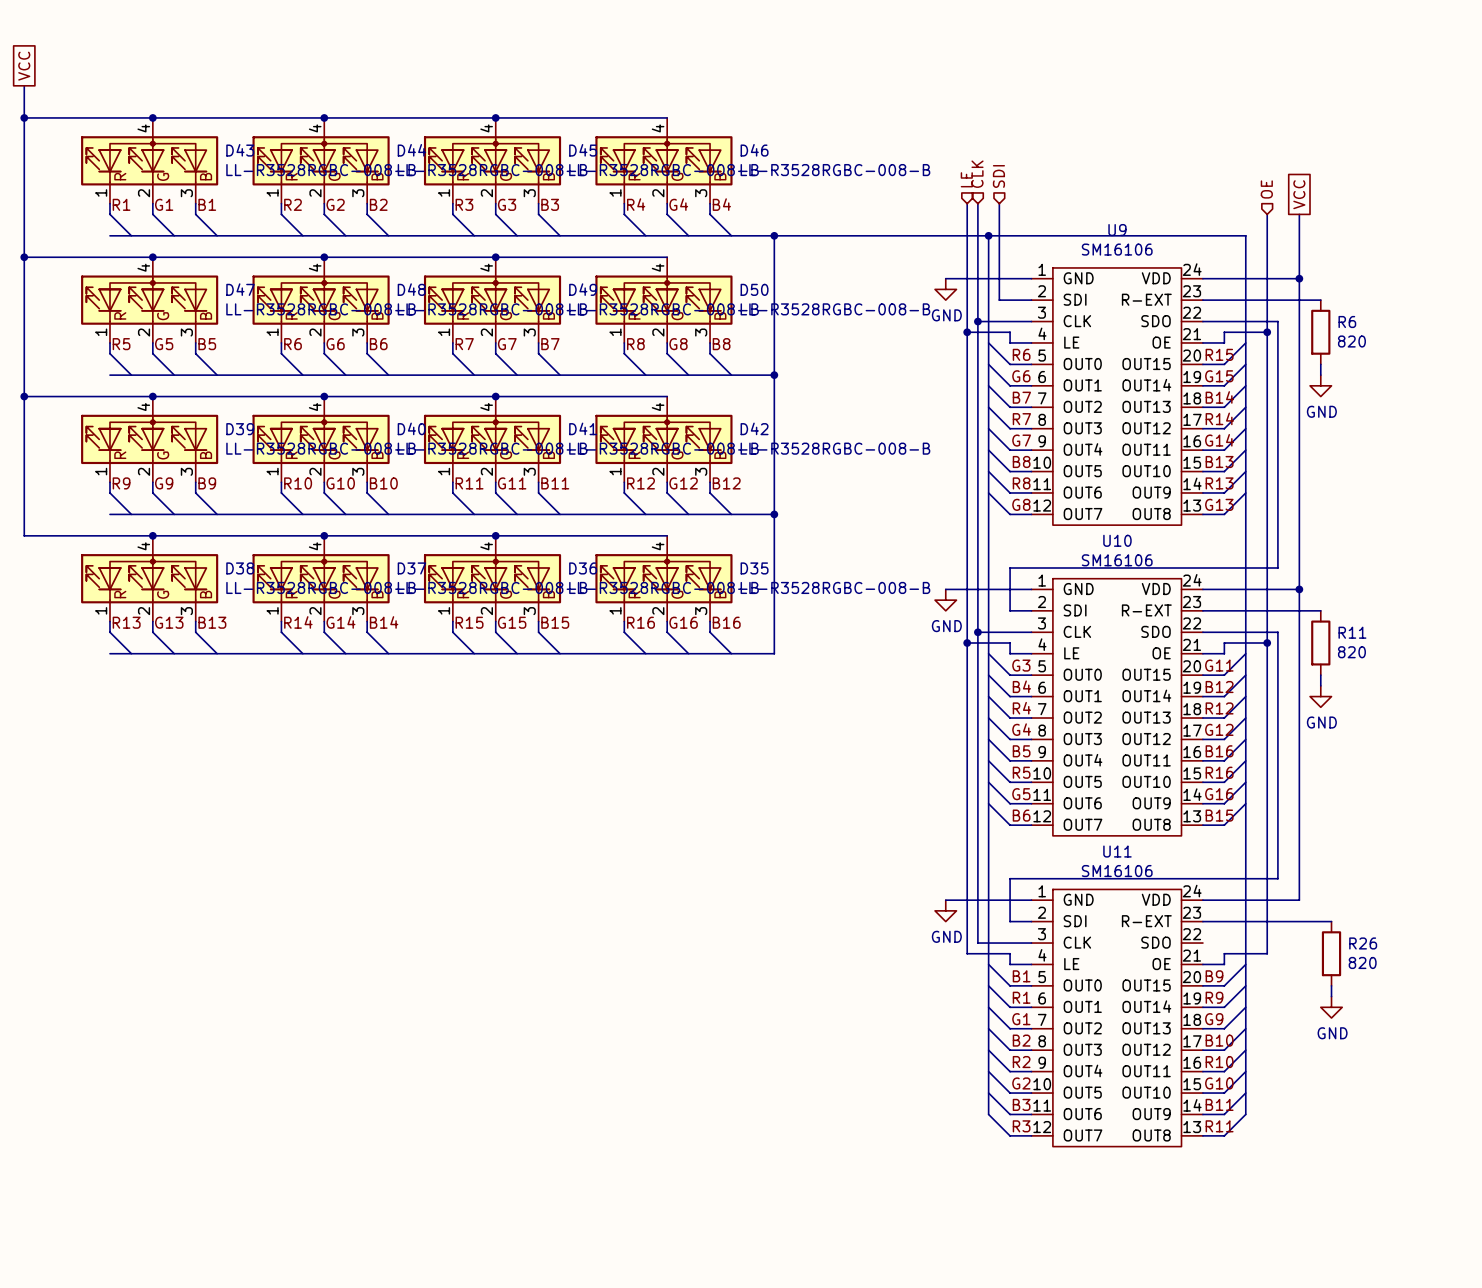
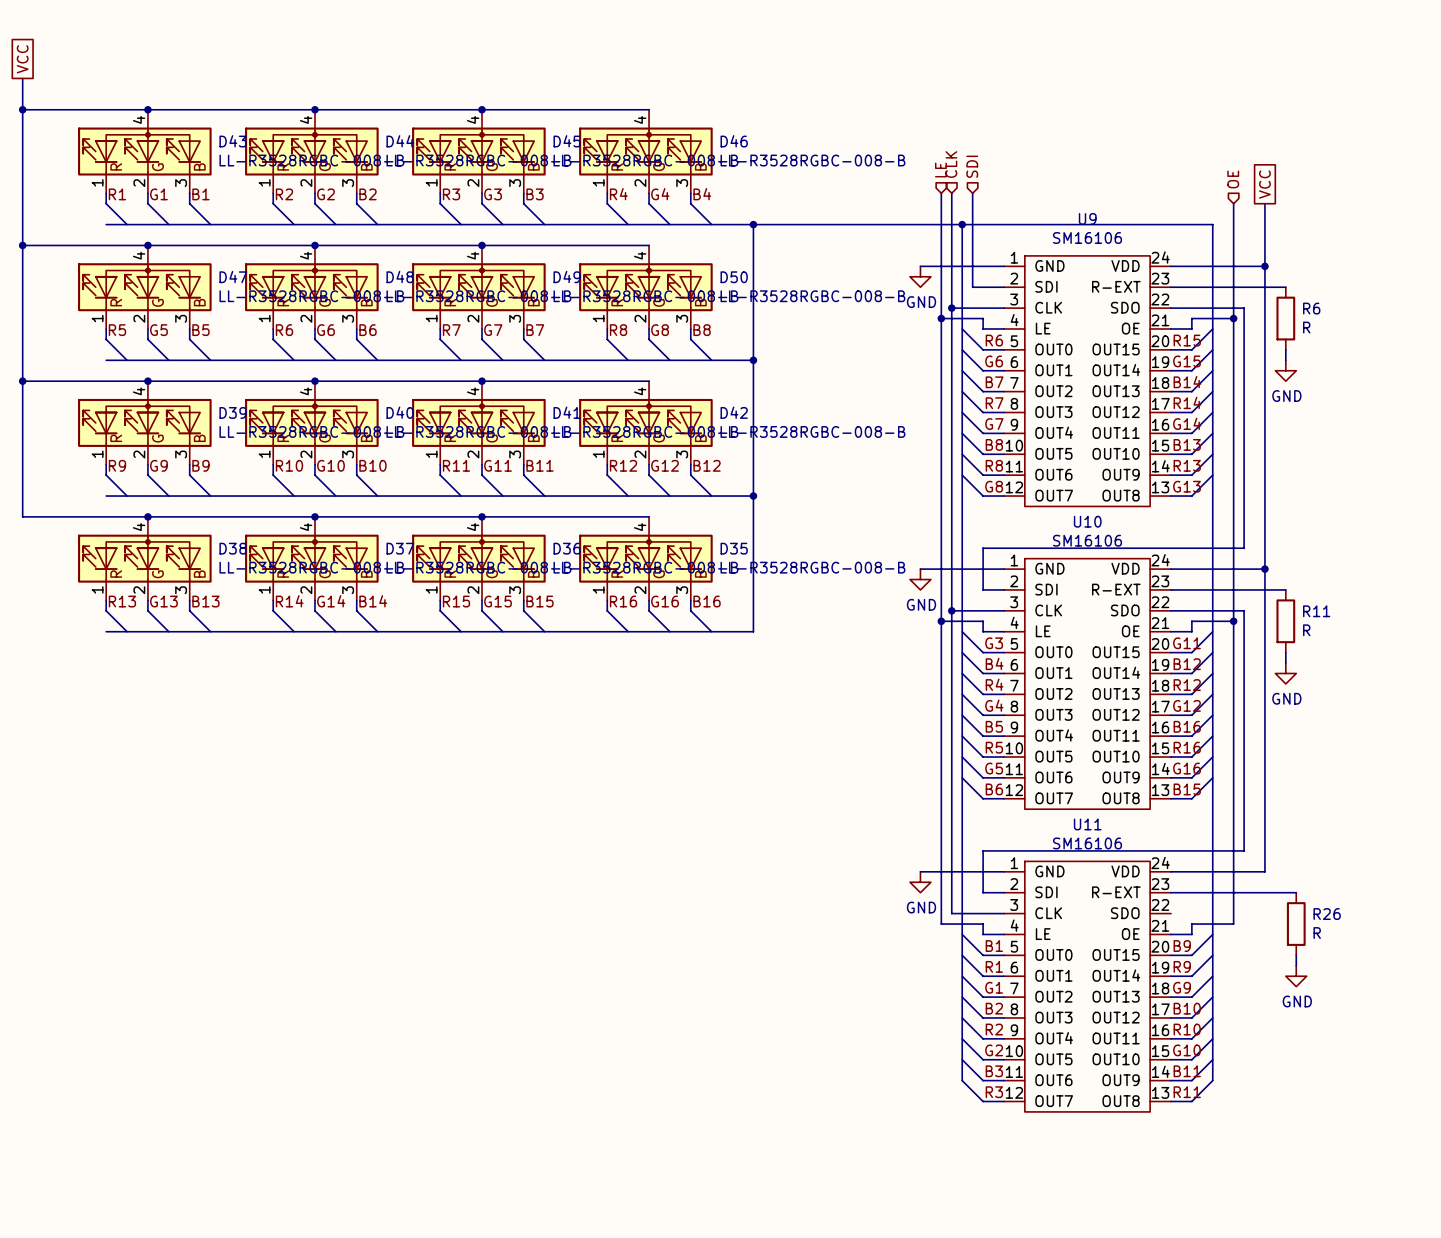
R6 value: 820 (1351, 341) -> R (1306, 327)
R11 value: 820 (1351, 652) -> R (1306, 630)
R26 value: 820 (1362, 962) -> R (1317, 933)

